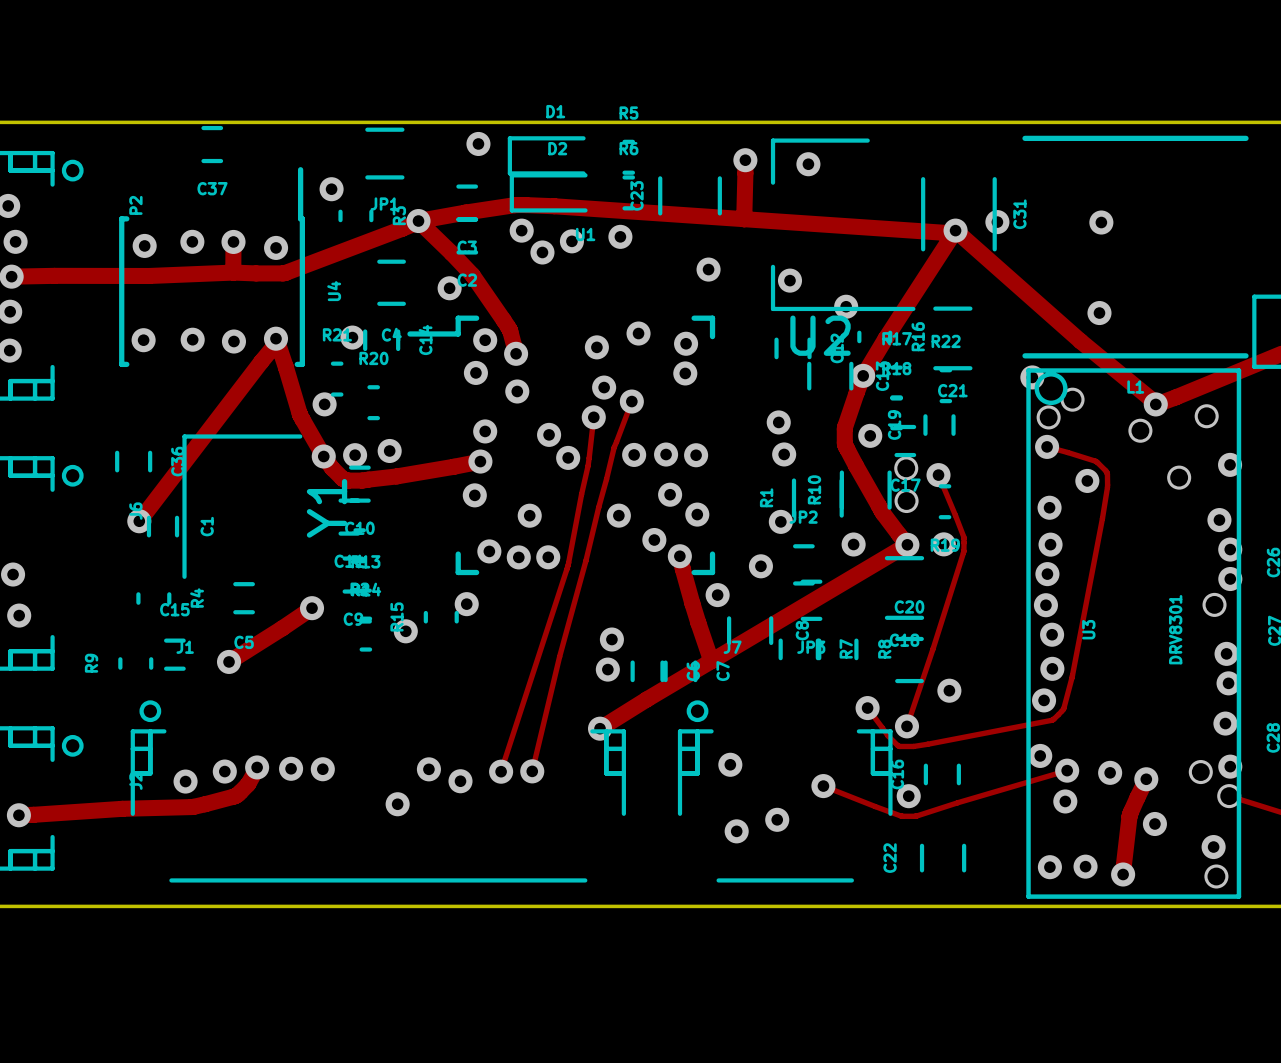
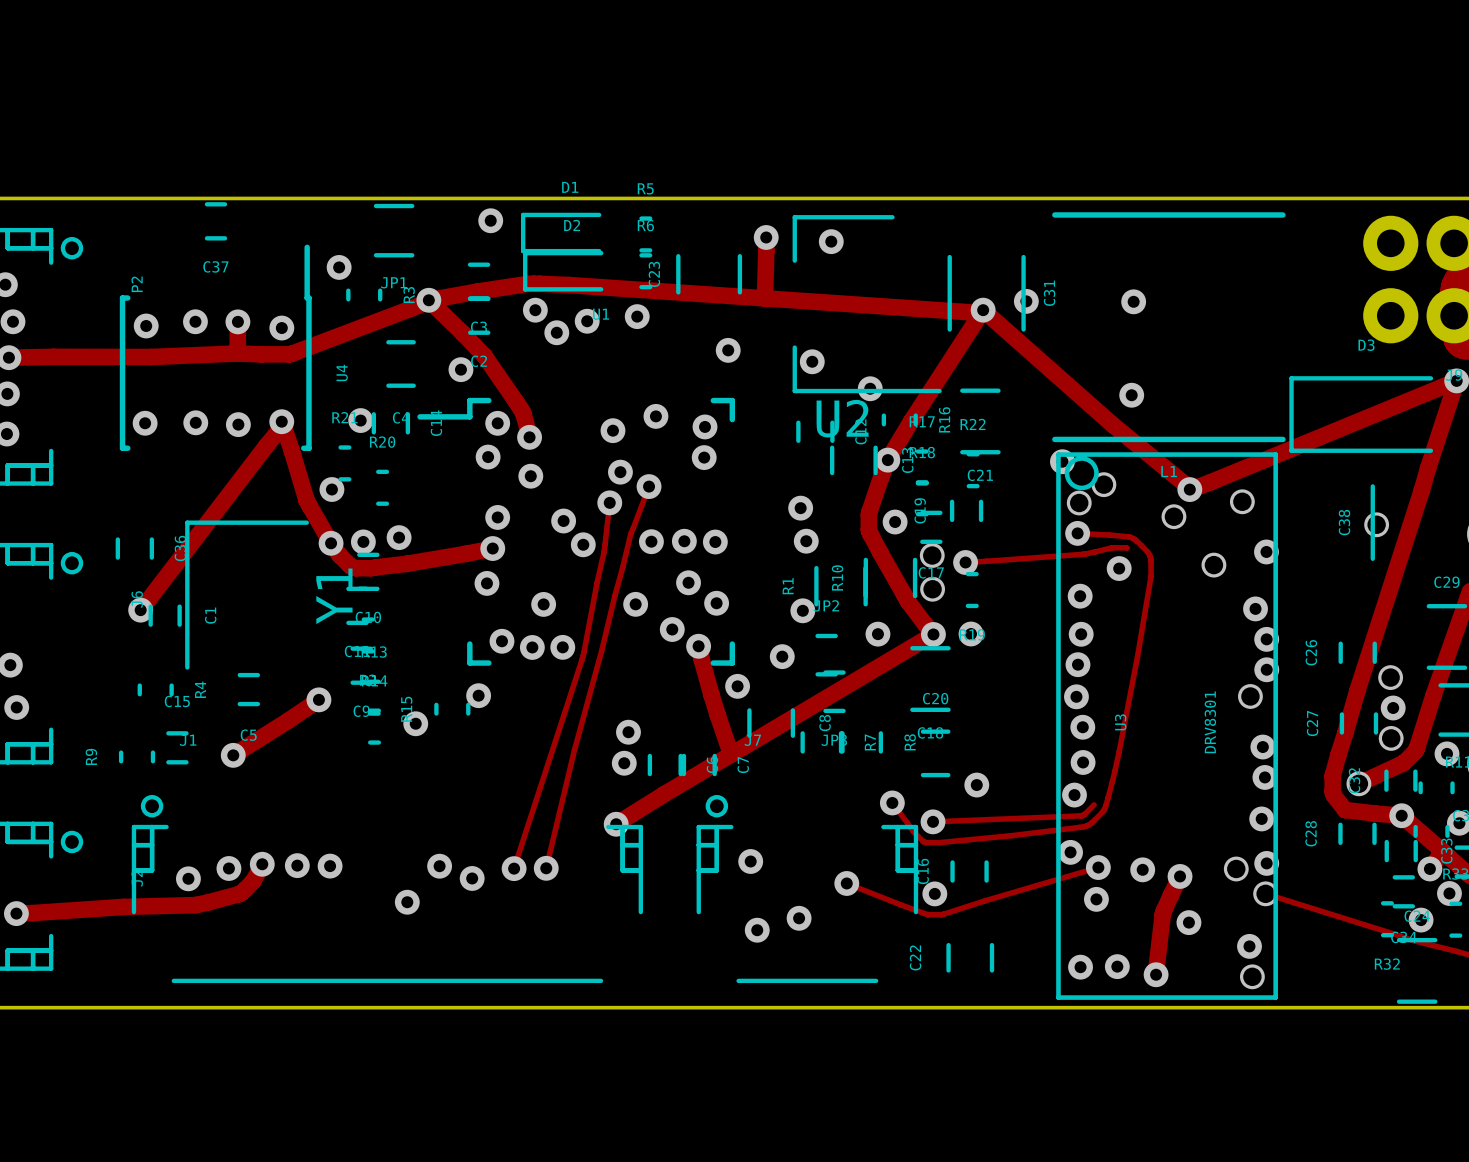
track: (1047, 446) (1095, 461) (1107, 473) -> none
track: none -> (1127, 548) (1112, 547) (1082, 554) (965, 562)
track: (1107, 474) (1107, 487) (1102, 518) (1072, 675) (1063, 709) (1051, 720) (913, 746) -> (1077, 533) (1131, 537) (1147, 551) (1151, 561) (1151, 576) (1137, 656) (1119, 752) (1105, 807) (1092, 822) (1084, 826) (939, 842)
track: (938, 475) (963, 537) (963, 551) (906, 726) -> (1094, 804) (1081, 815) (933, 821)

